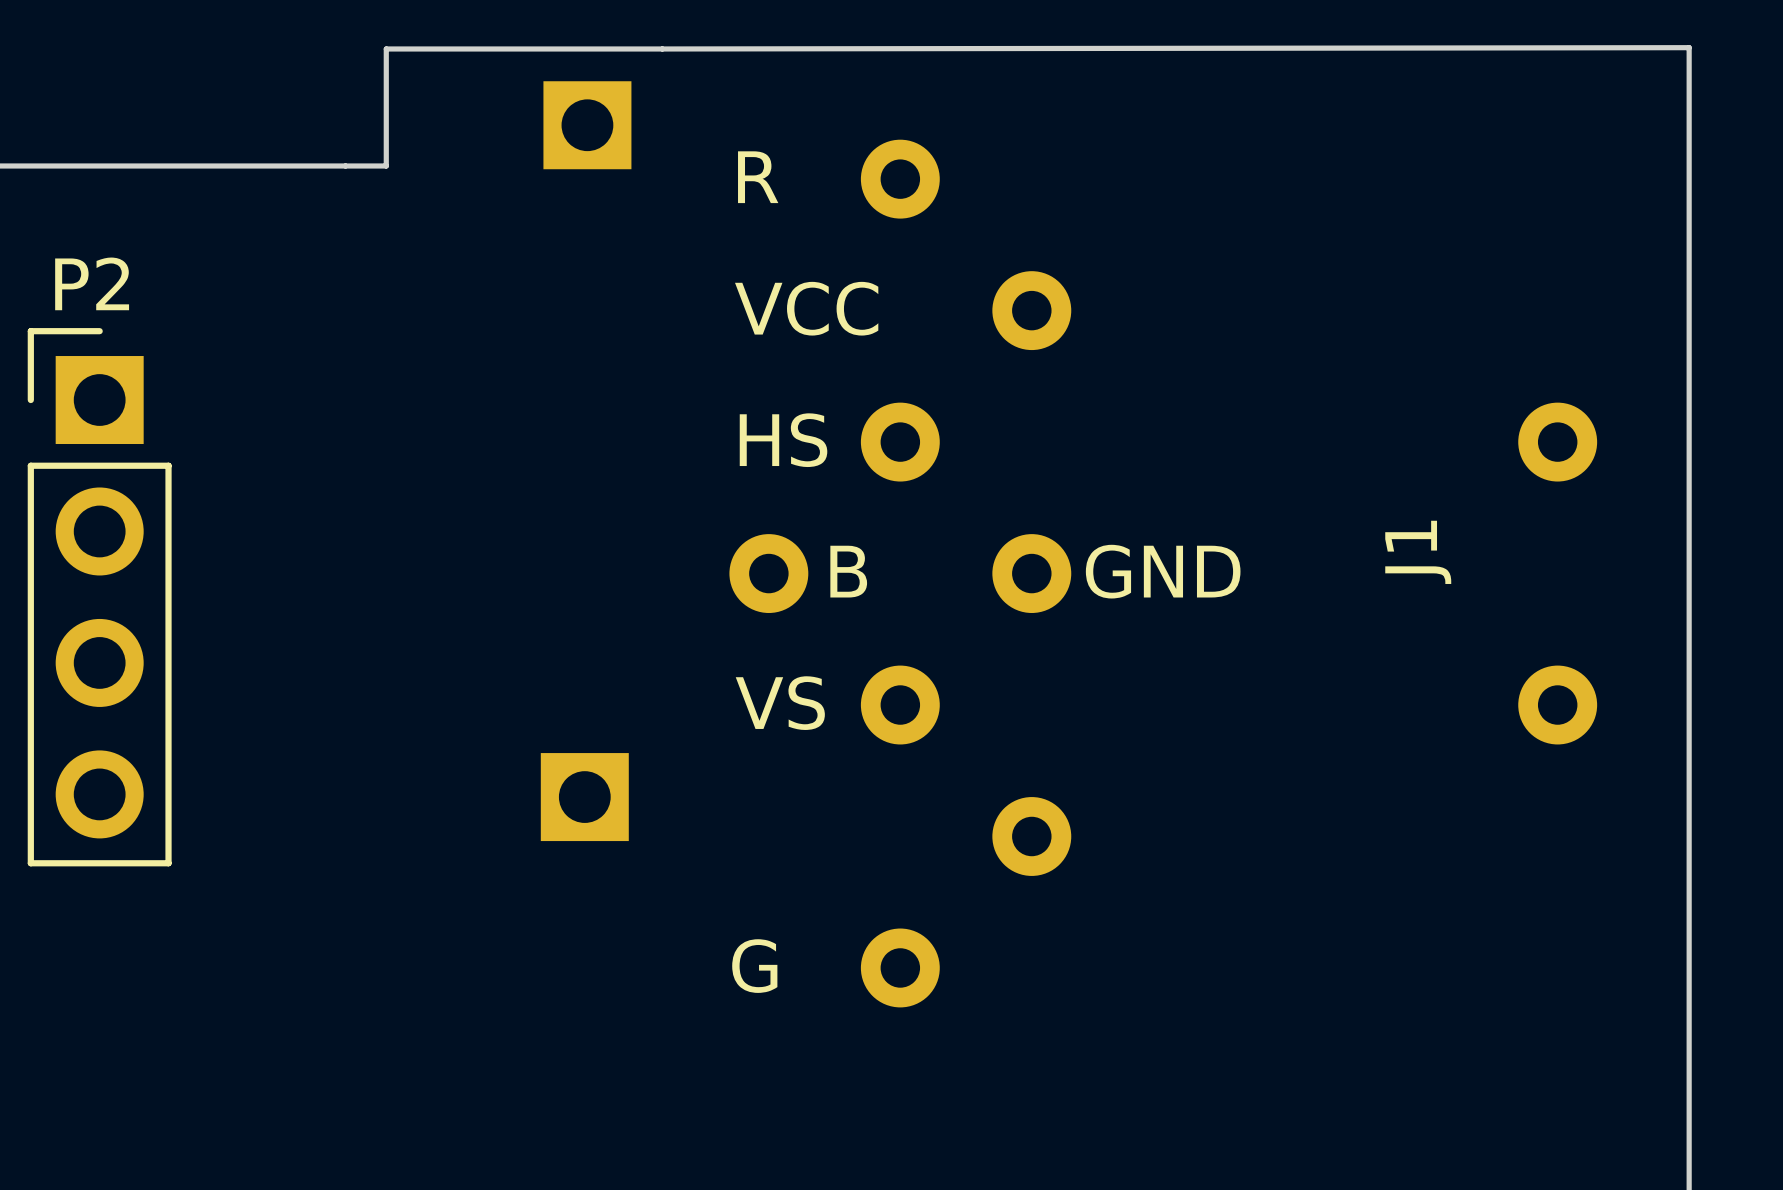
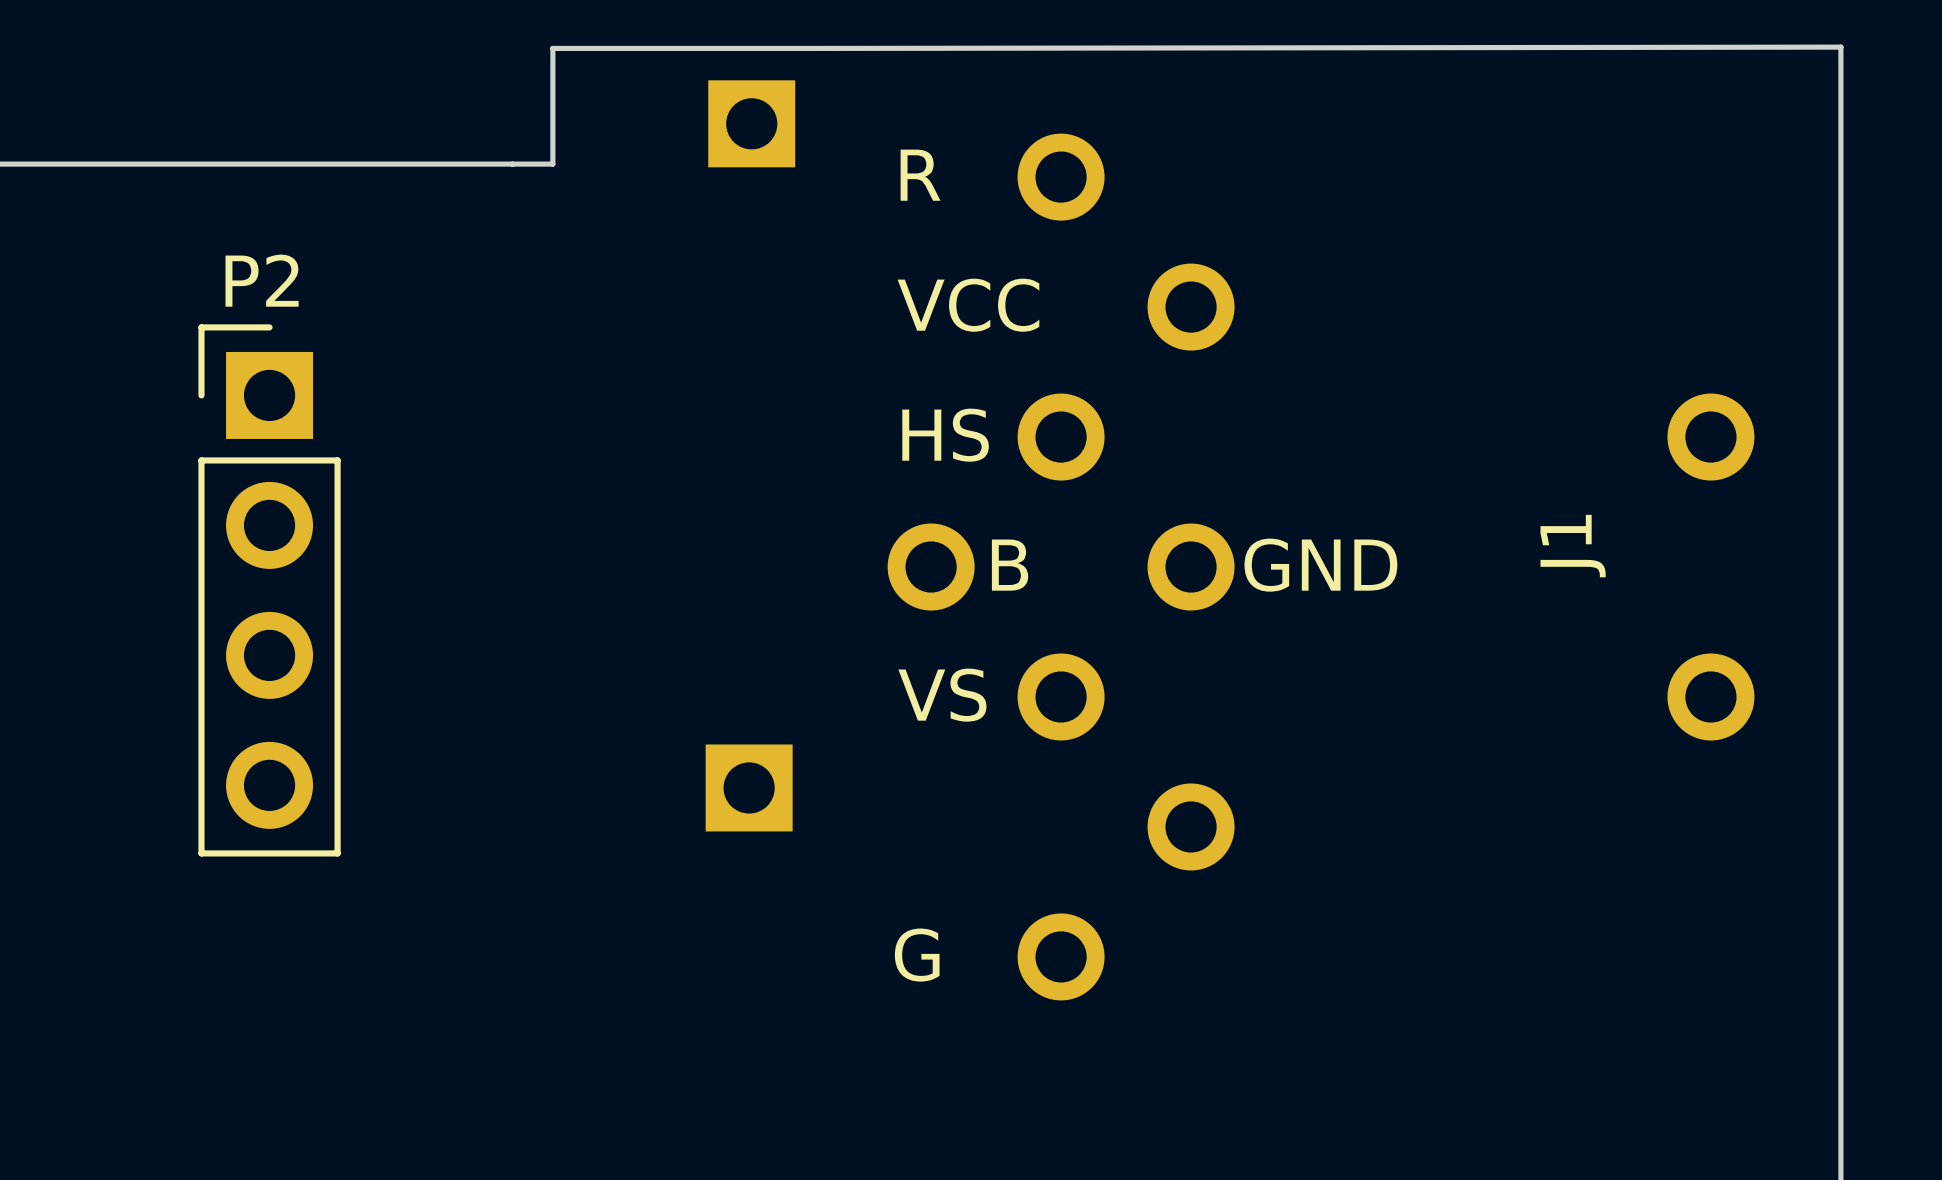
J1 footprint: [729, 139, 1598, 1008] -> [887, 133, 1755, 1001]

